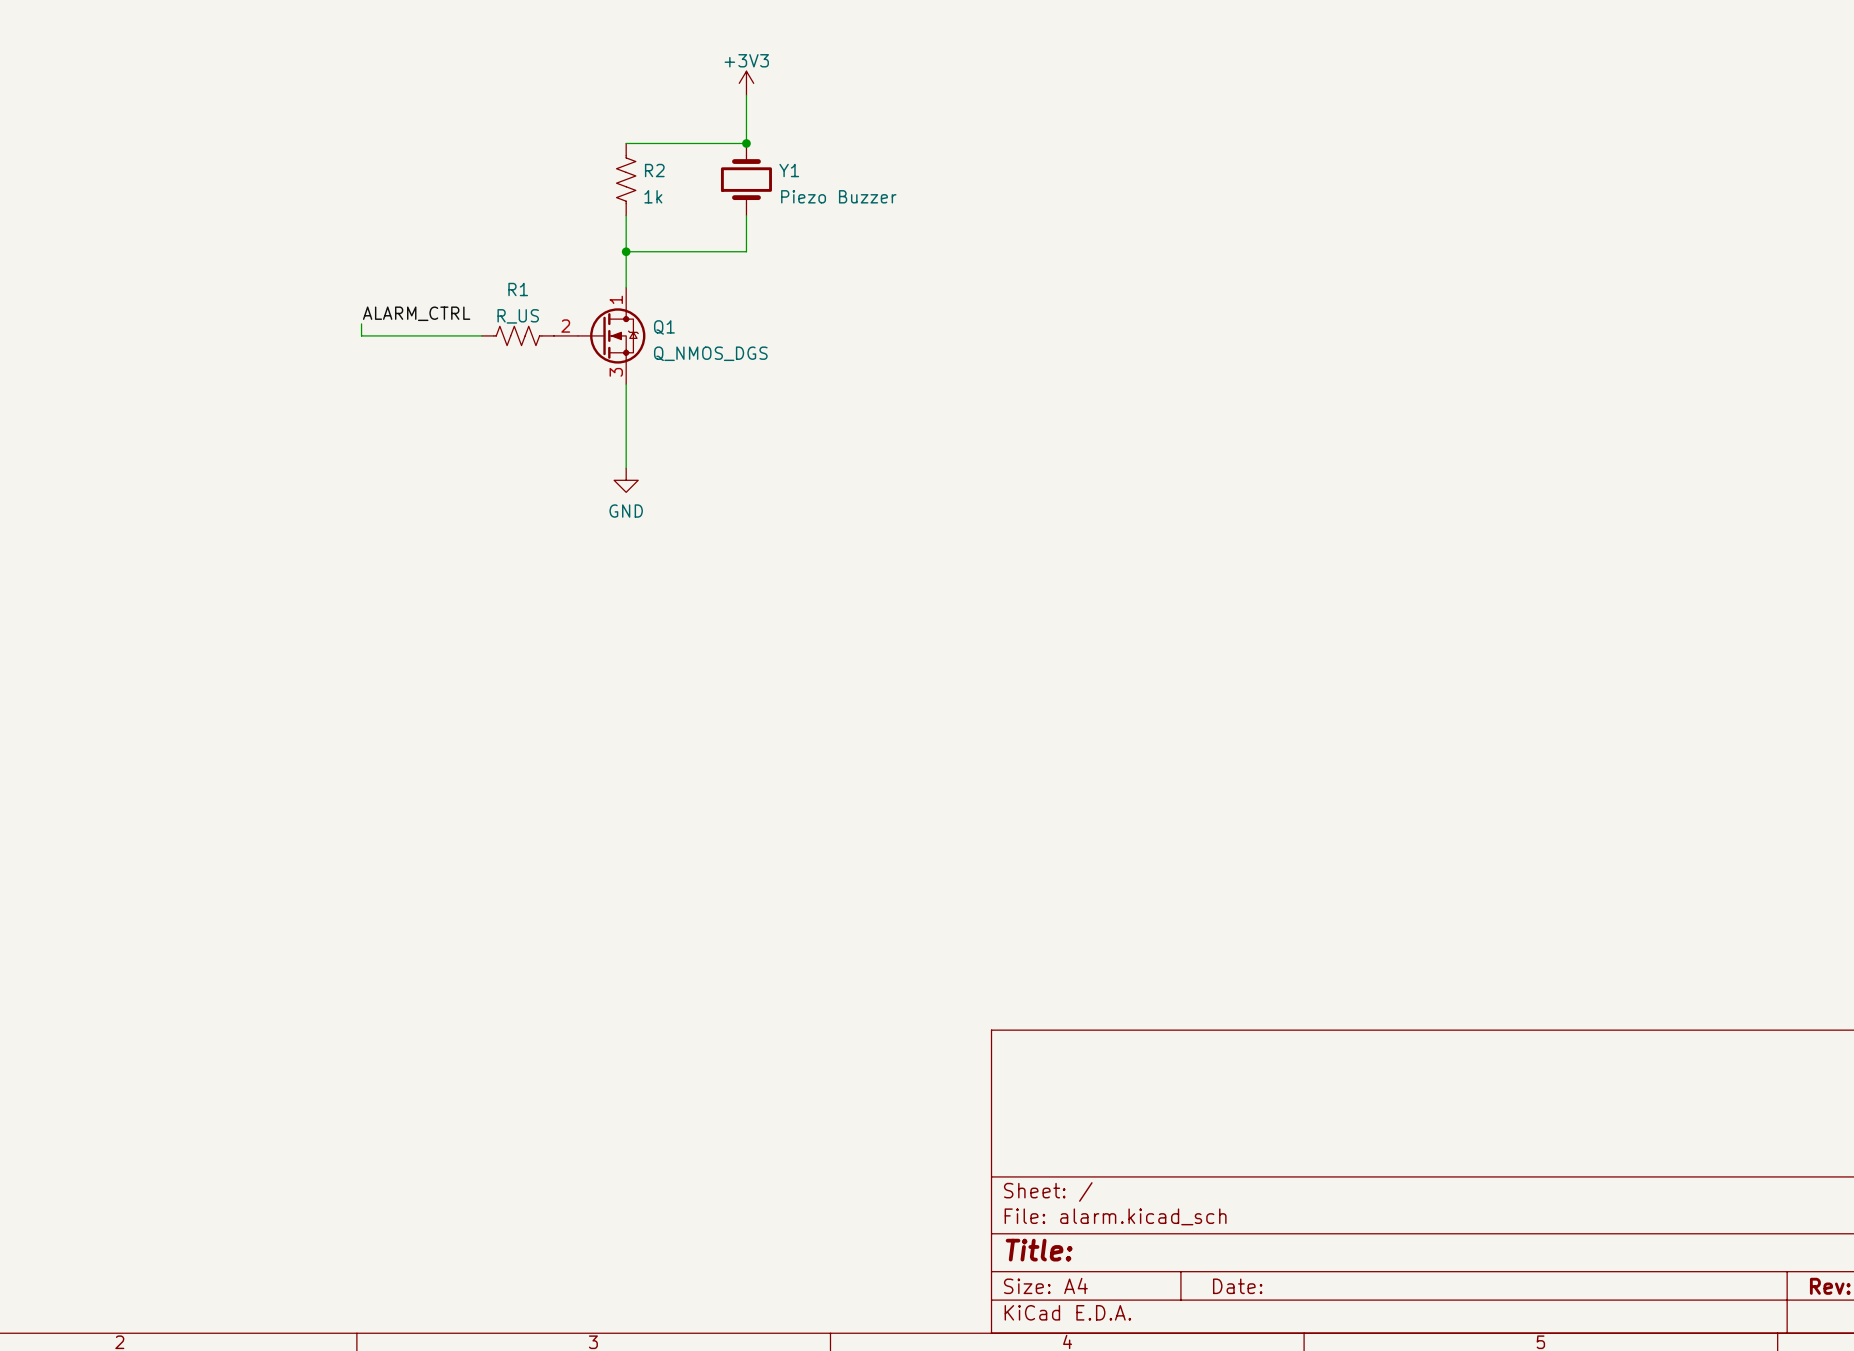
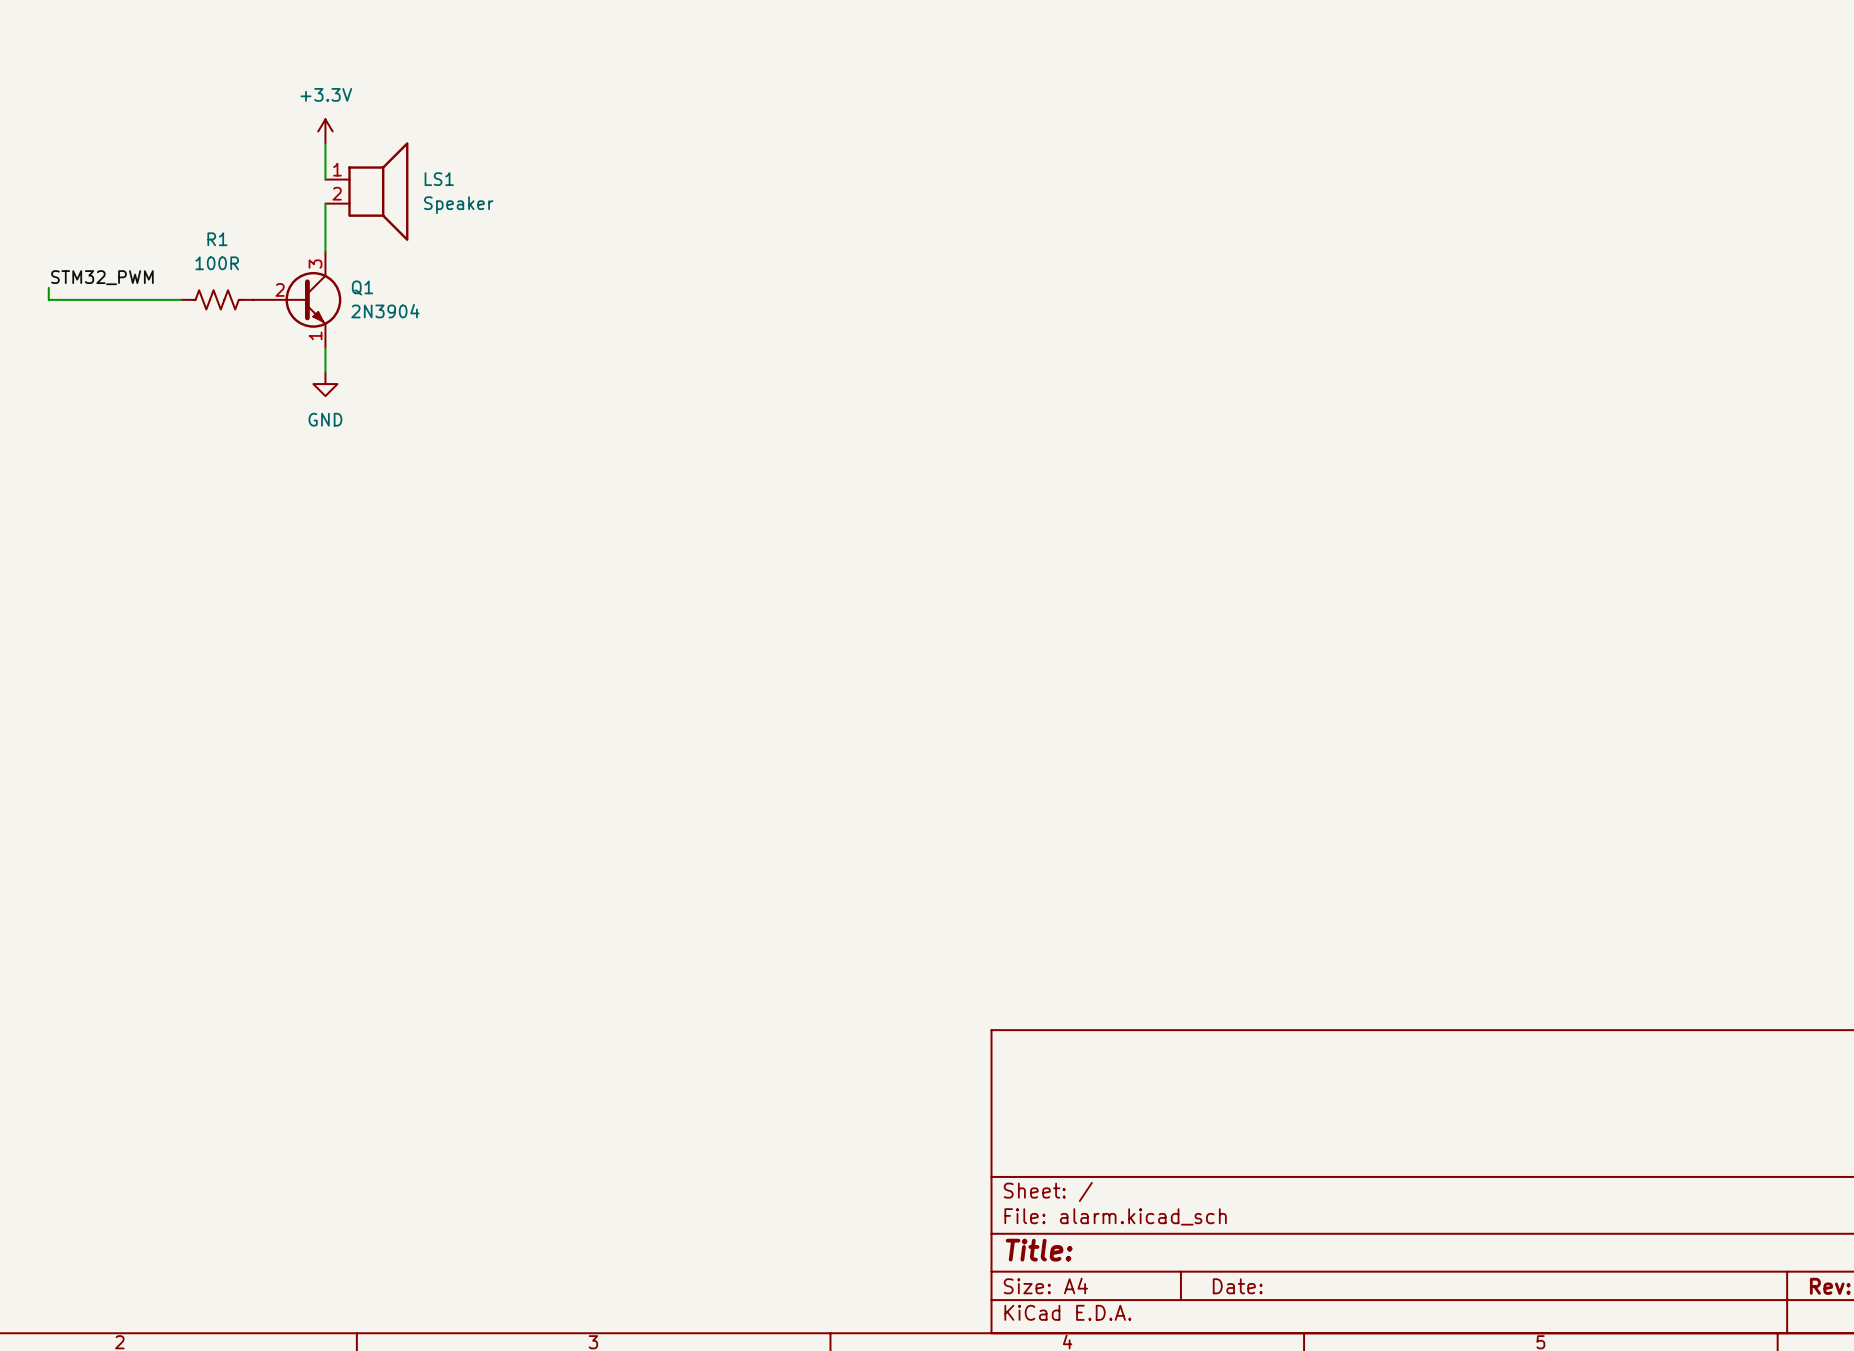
power symbol: +3V3 (746, 83) -> none
wire: (746, 95) (746, 143) (626, 143) -> none
power symbol: none -> +3.3V (325, 131)
wire: none -> (325, 143) (325, 179)
junction: (746, 143) -> none
R2: 1k (626, 179) -> none
Y1: Piezo Buzzer (746, 179) -> none
LS1: none -> Speaker (366, 191)
wire: none -> (325, 203) (325, 251)
wire: (626, 215) (626, 287) -> none
wire: (746, 215) (746, 251) (626, 251) -> none
junction: (626, 251) -> none
label: none -> STM32_PWM (102, 277)
wire: none -> (48, 287) (48, 299) (181, 299)
Q1 symbol: [554, 287, 646, 385] -> [253, 251, 342, 348]
R1 name position: R1 (518, 289) -> R1 (217, 239)
label: ALARM_CTRL (416, 313) -> none
R1 value: R_US (518, 316) -> 100R (217, 263)
wire: (361, 323) (361, 335) (481, 335) -> none
R1 position: (517, 335) -> (217, 299)
wire: none -> (325, 347) (325, 372)
Q1 value: Q_NMOS_DGS (710, 353) -> 2N3904 (385, 311)
power symbol: none -> GND (325, 384)
wire: (626, 384) (626, 468) -> none
power symbol: GND (626, 480) -> none

